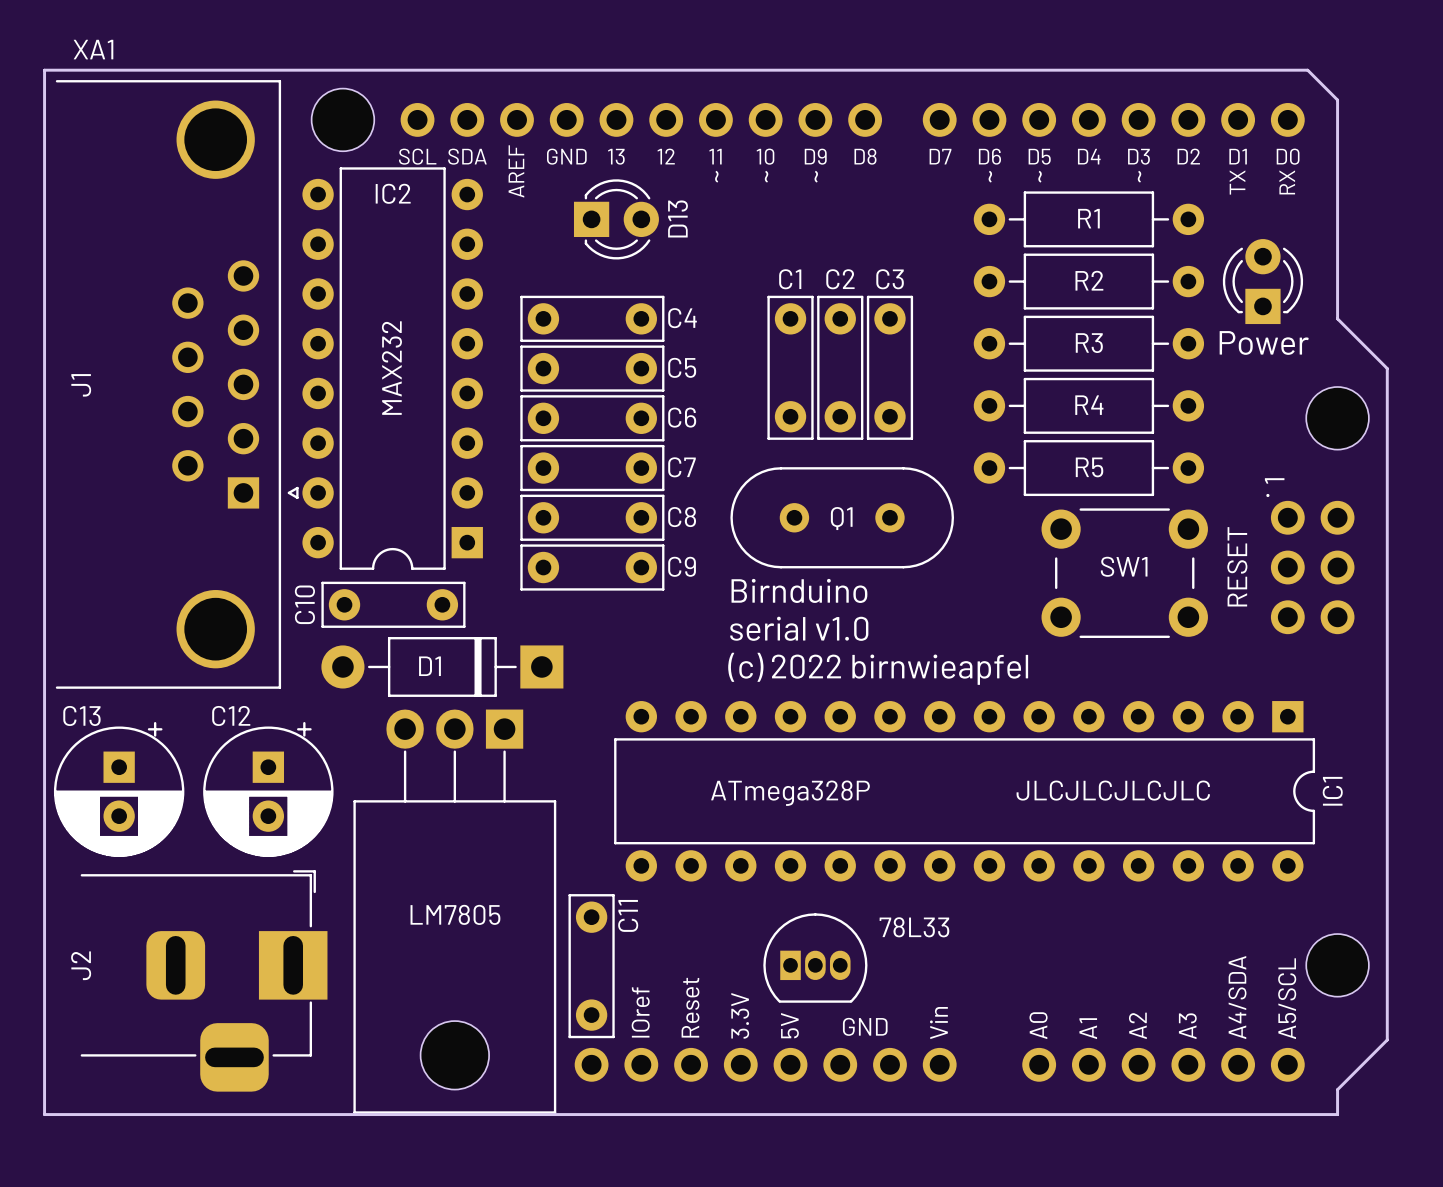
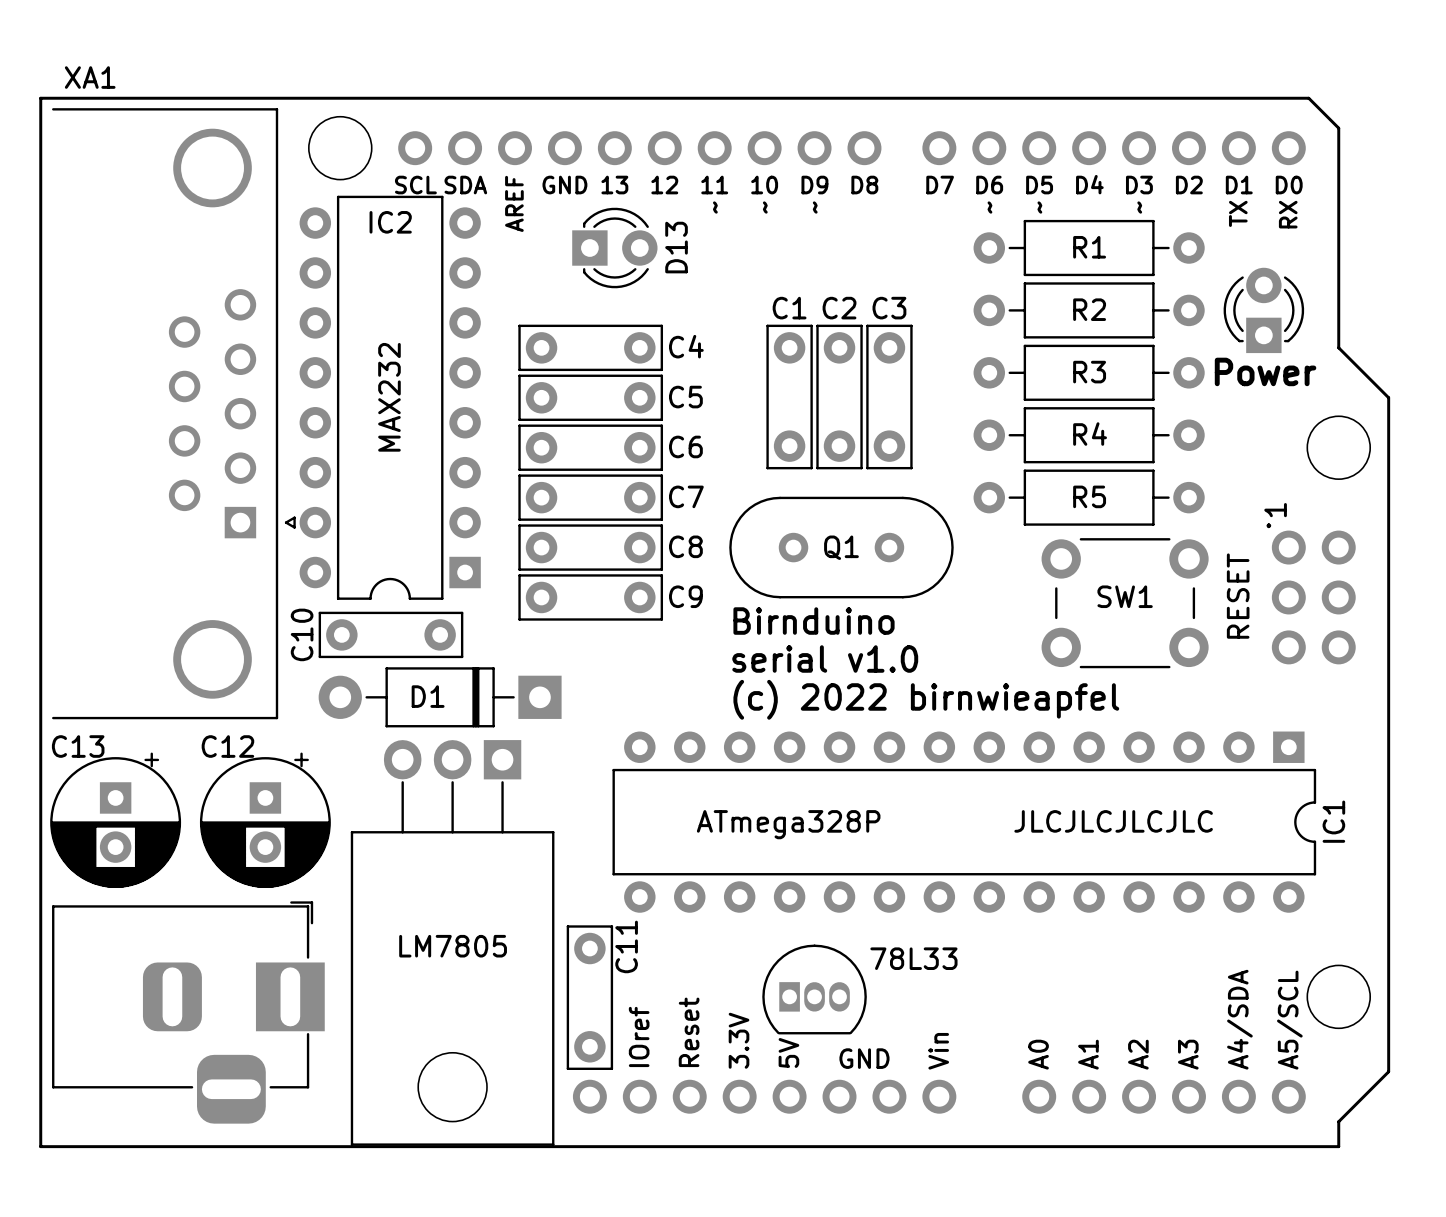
XA1 footprint: [43, 68, 1389, 1117] -> [39, 96, 1391, 1149]
J1: (177, 384) -> none
J2: (204, 980) -> none

